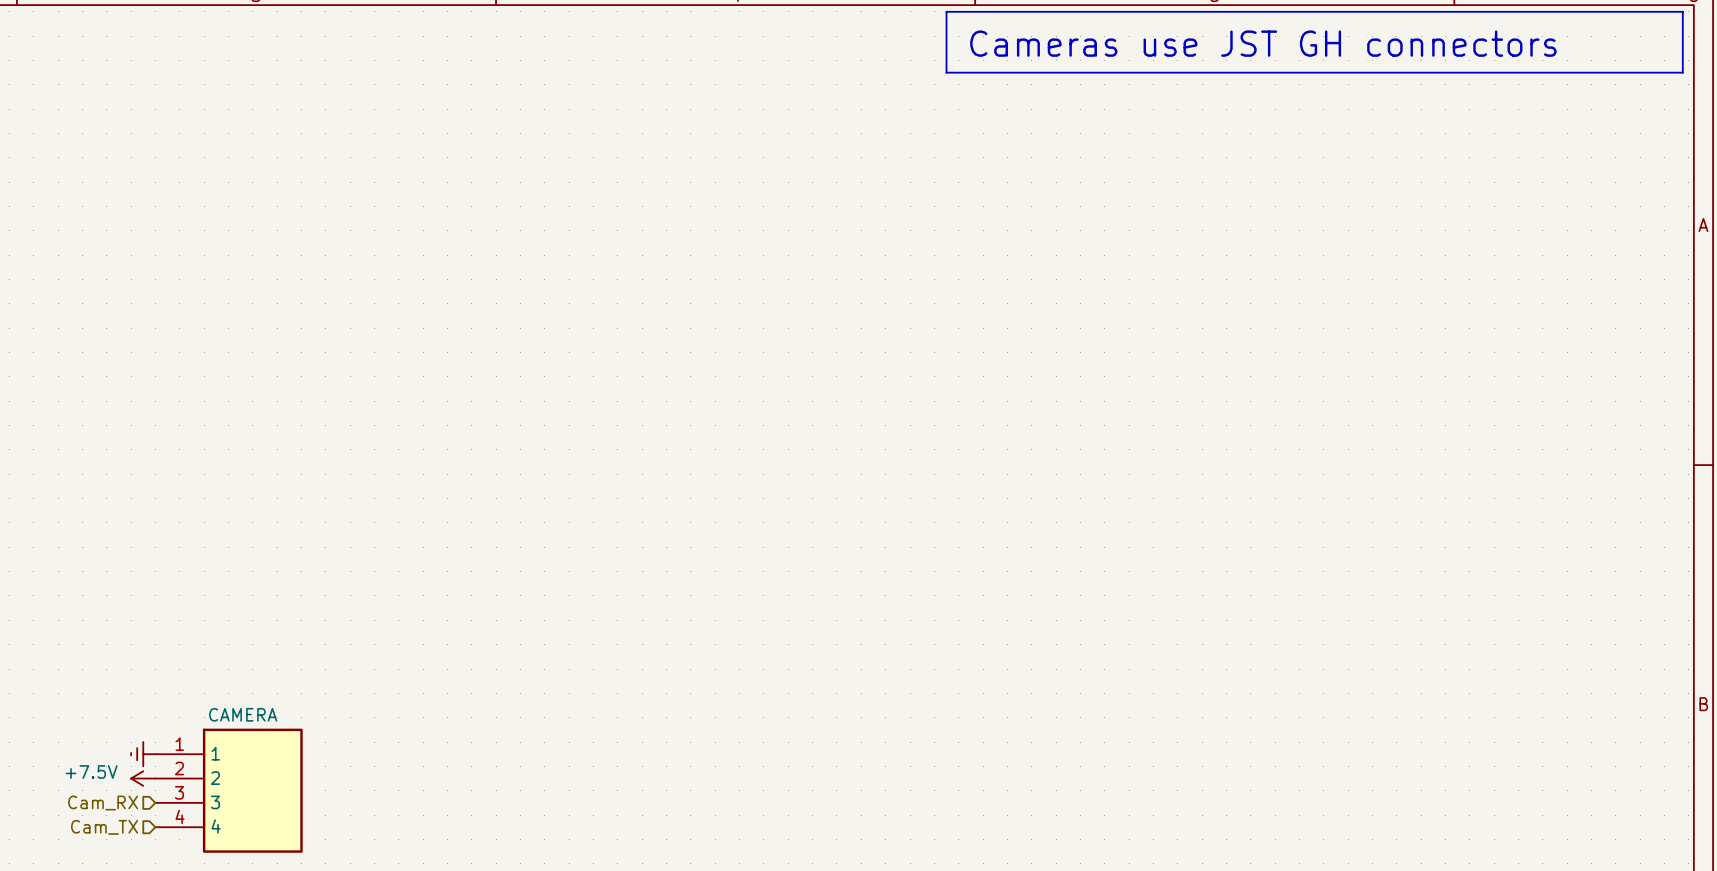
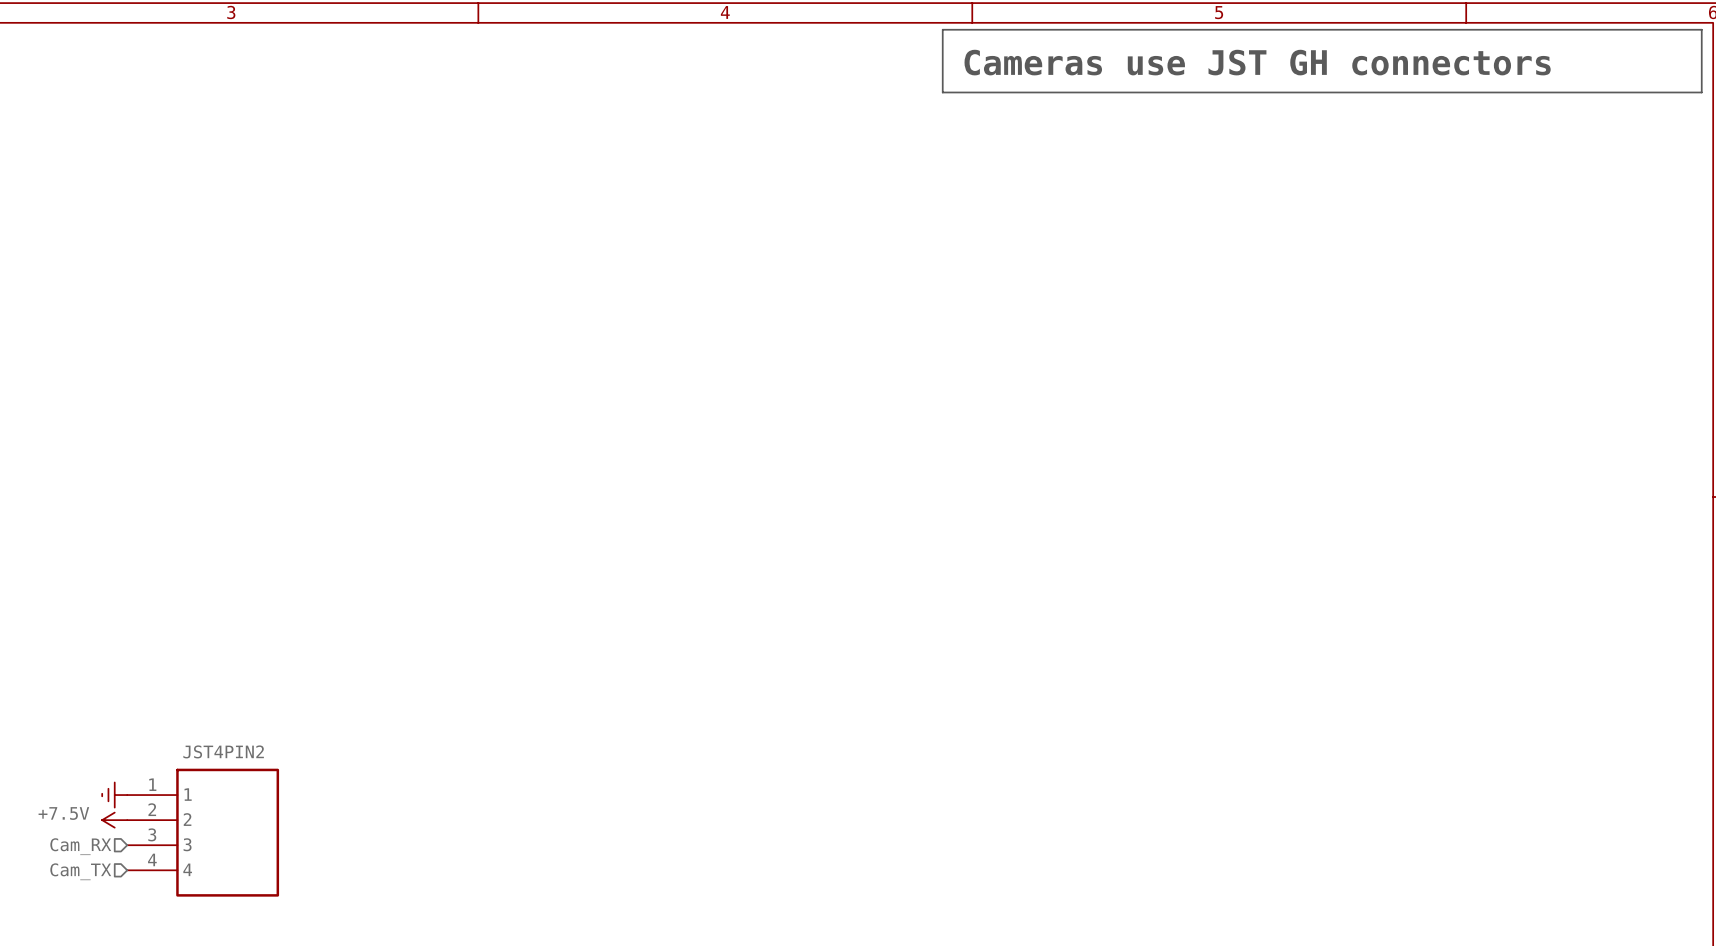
JST4PIN2 name: none -> JST4PIN2 (223, 751)
JST4PIN2 value: CAMERA (243, 714) -> none

